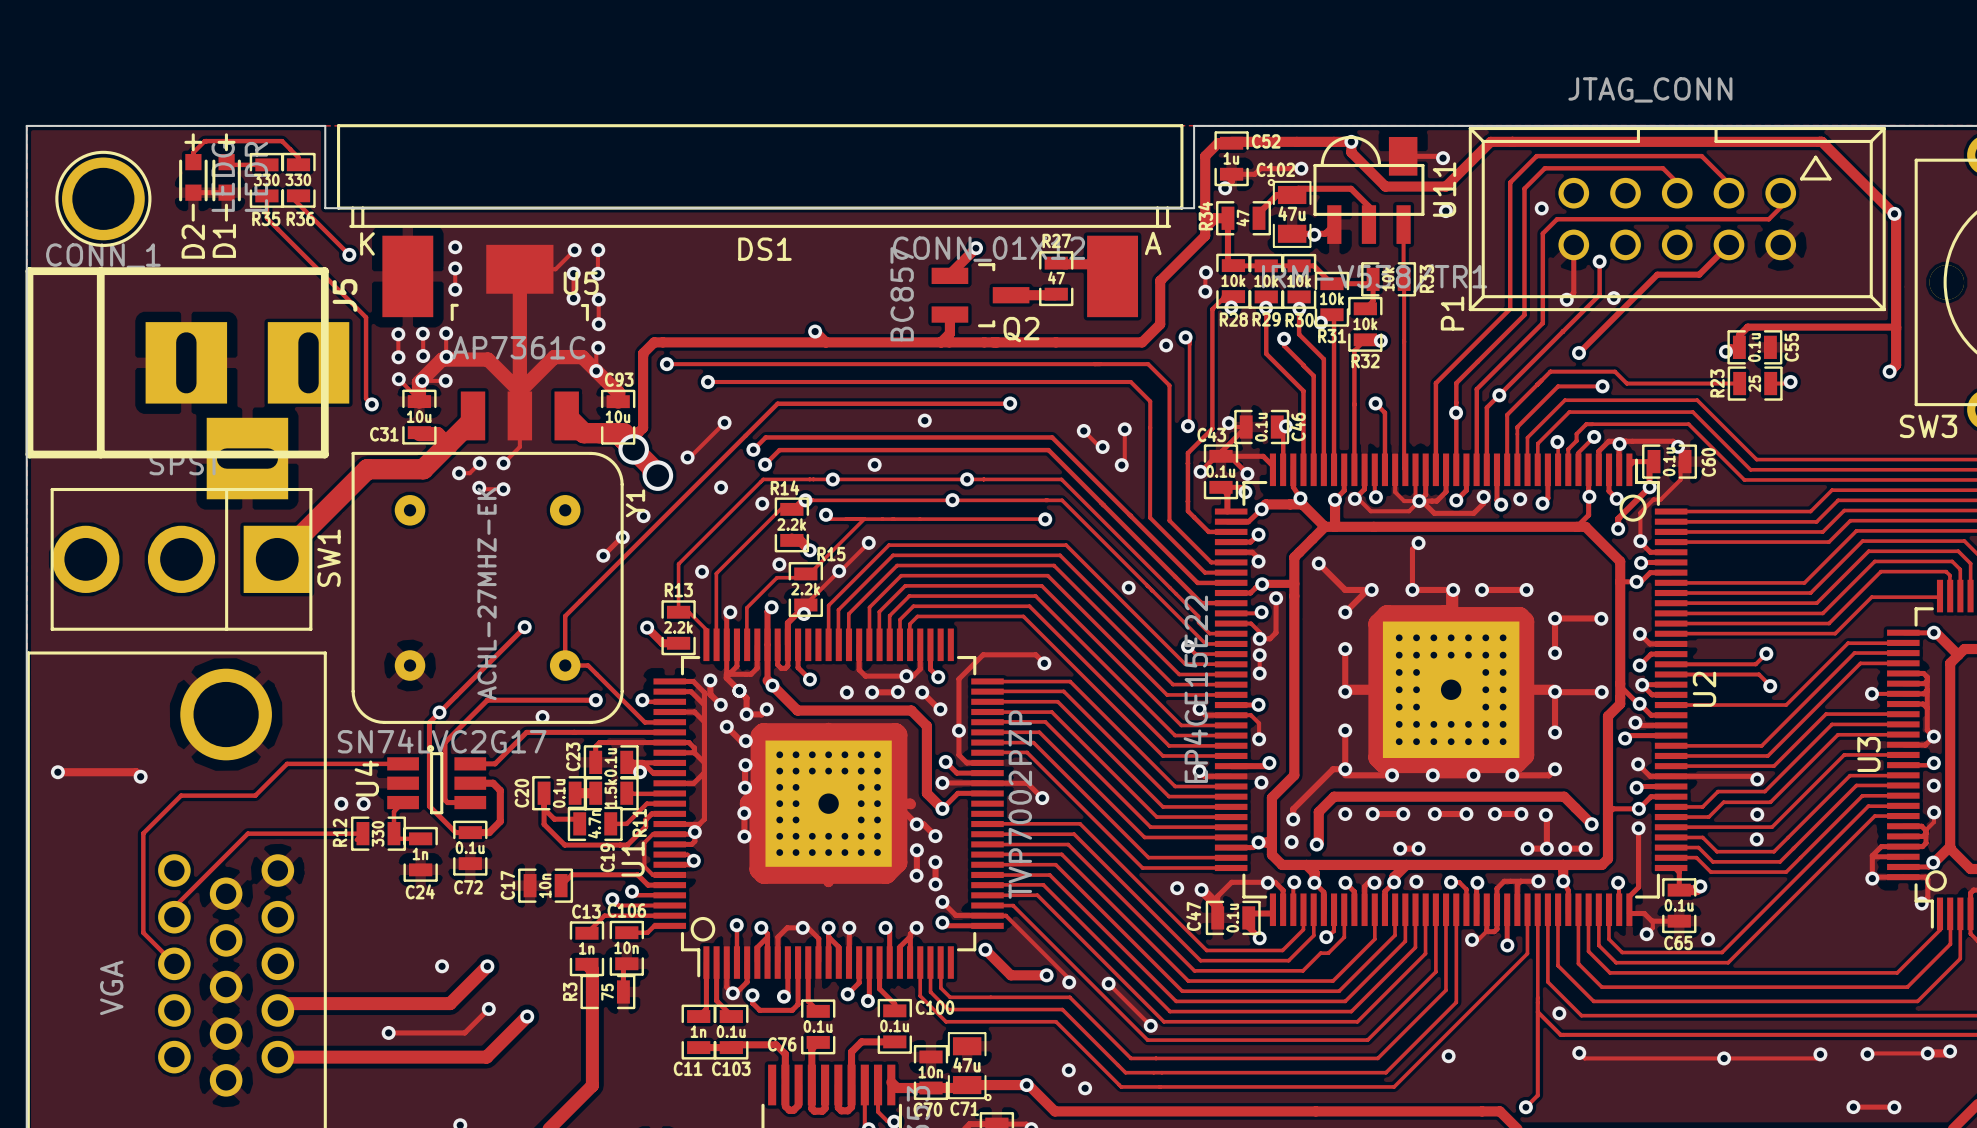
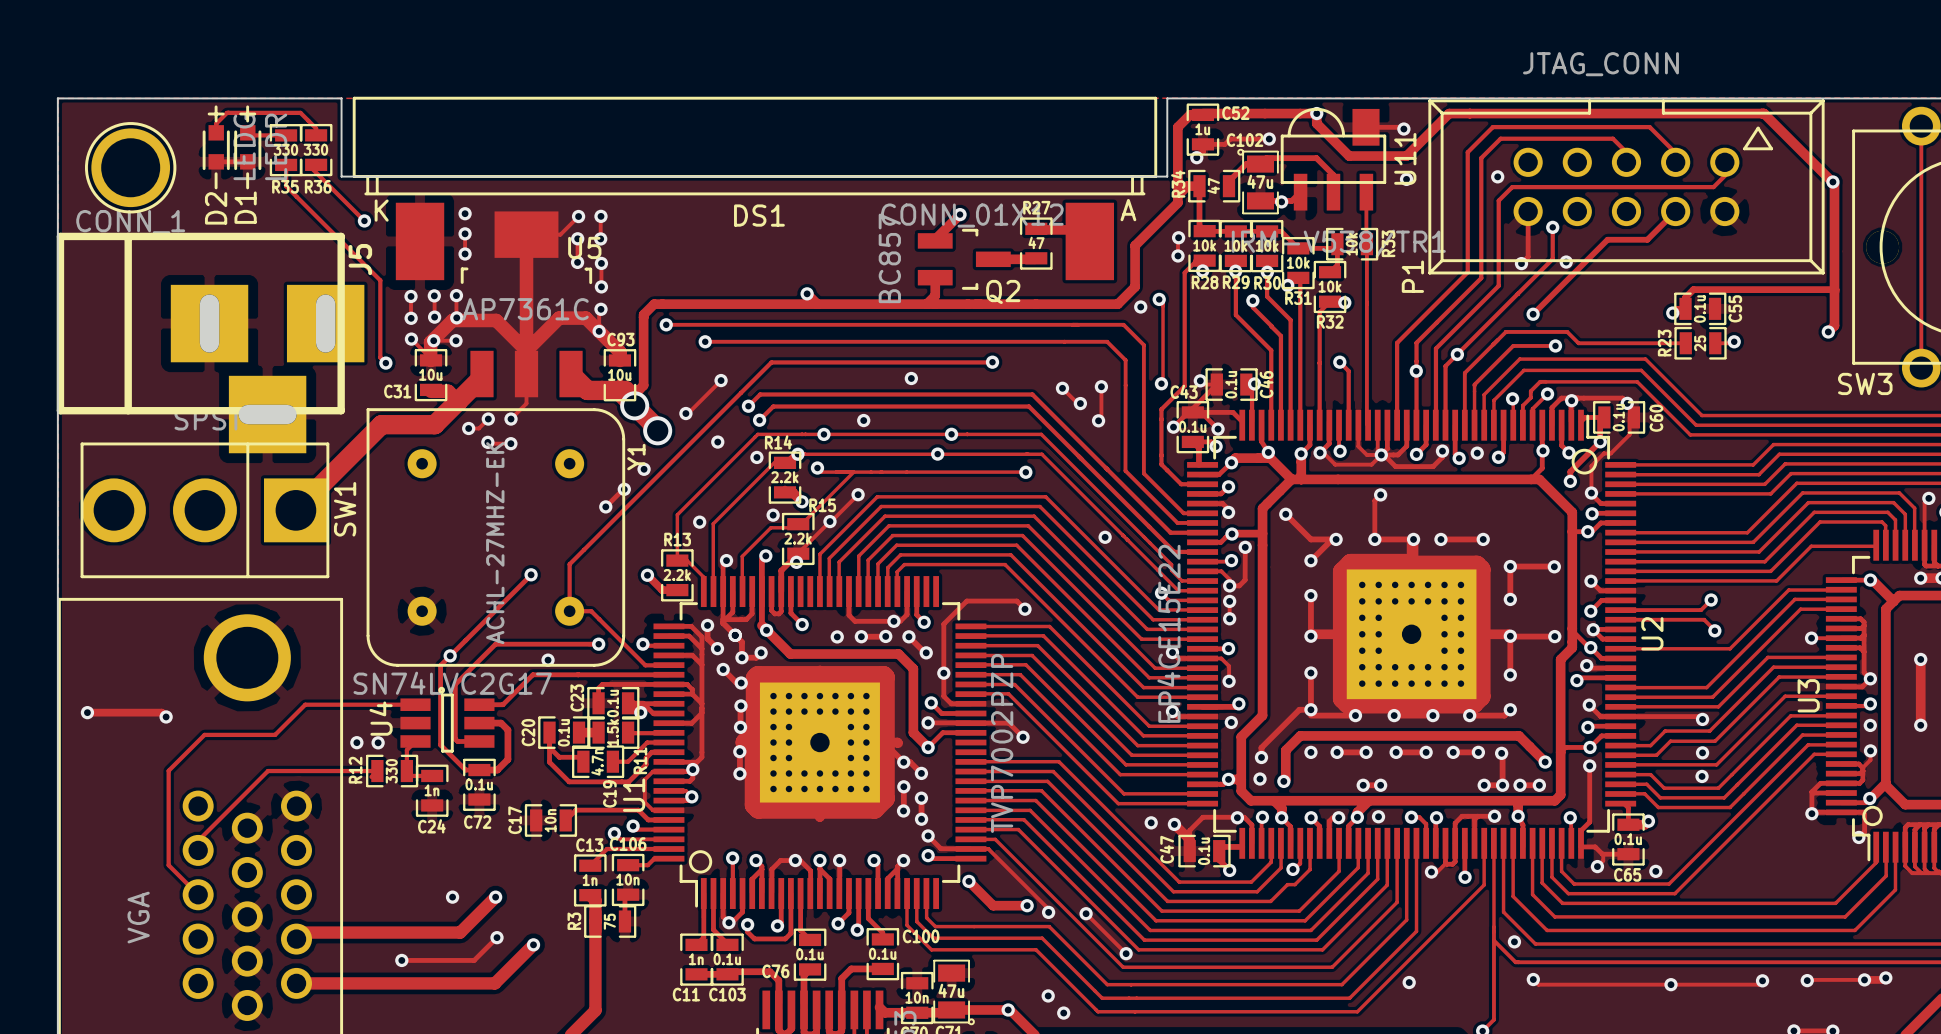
board edge: none -> (209, 304) (209, 342)
board edge: none -> (325, 304) (325, 342)
board edge: none -> (248, 414) (286, 414)

